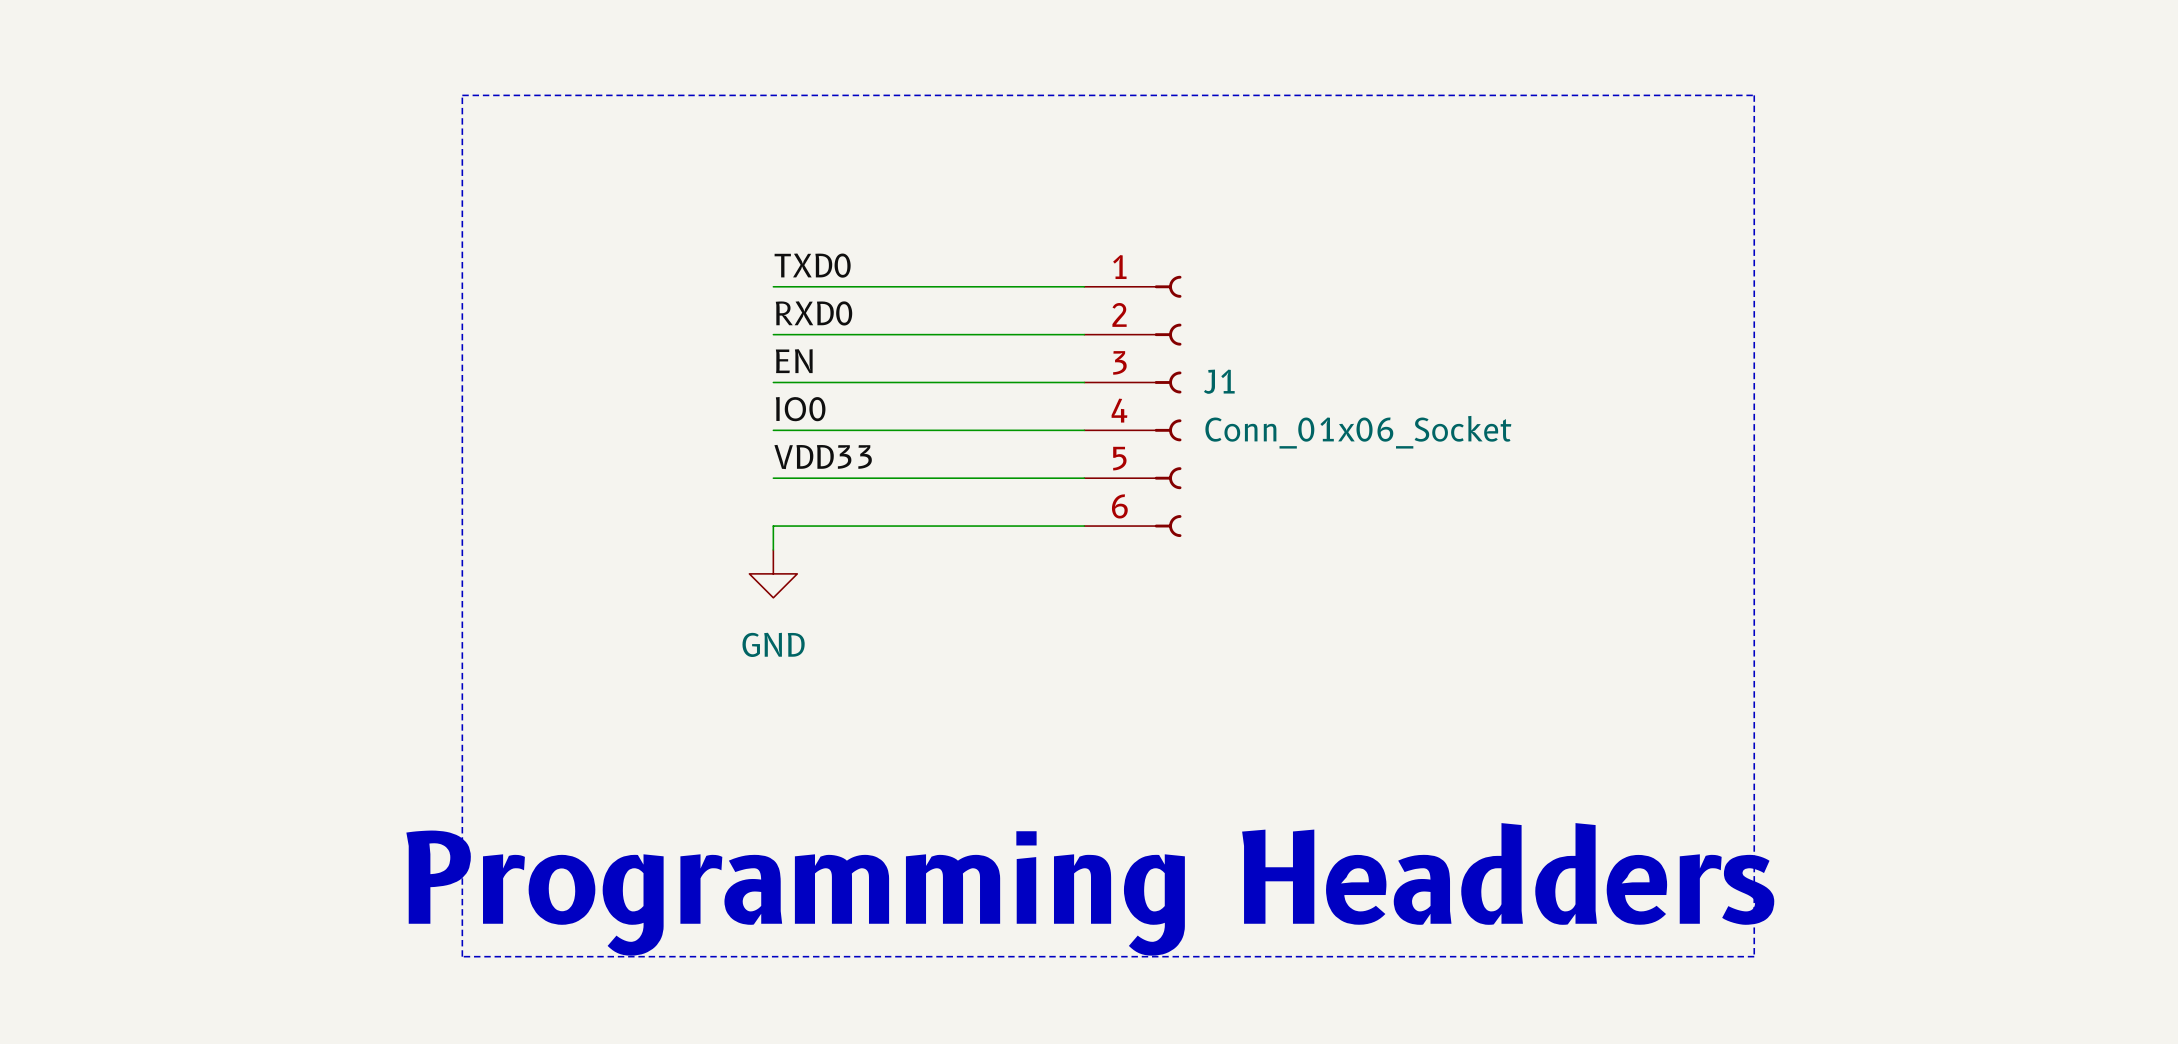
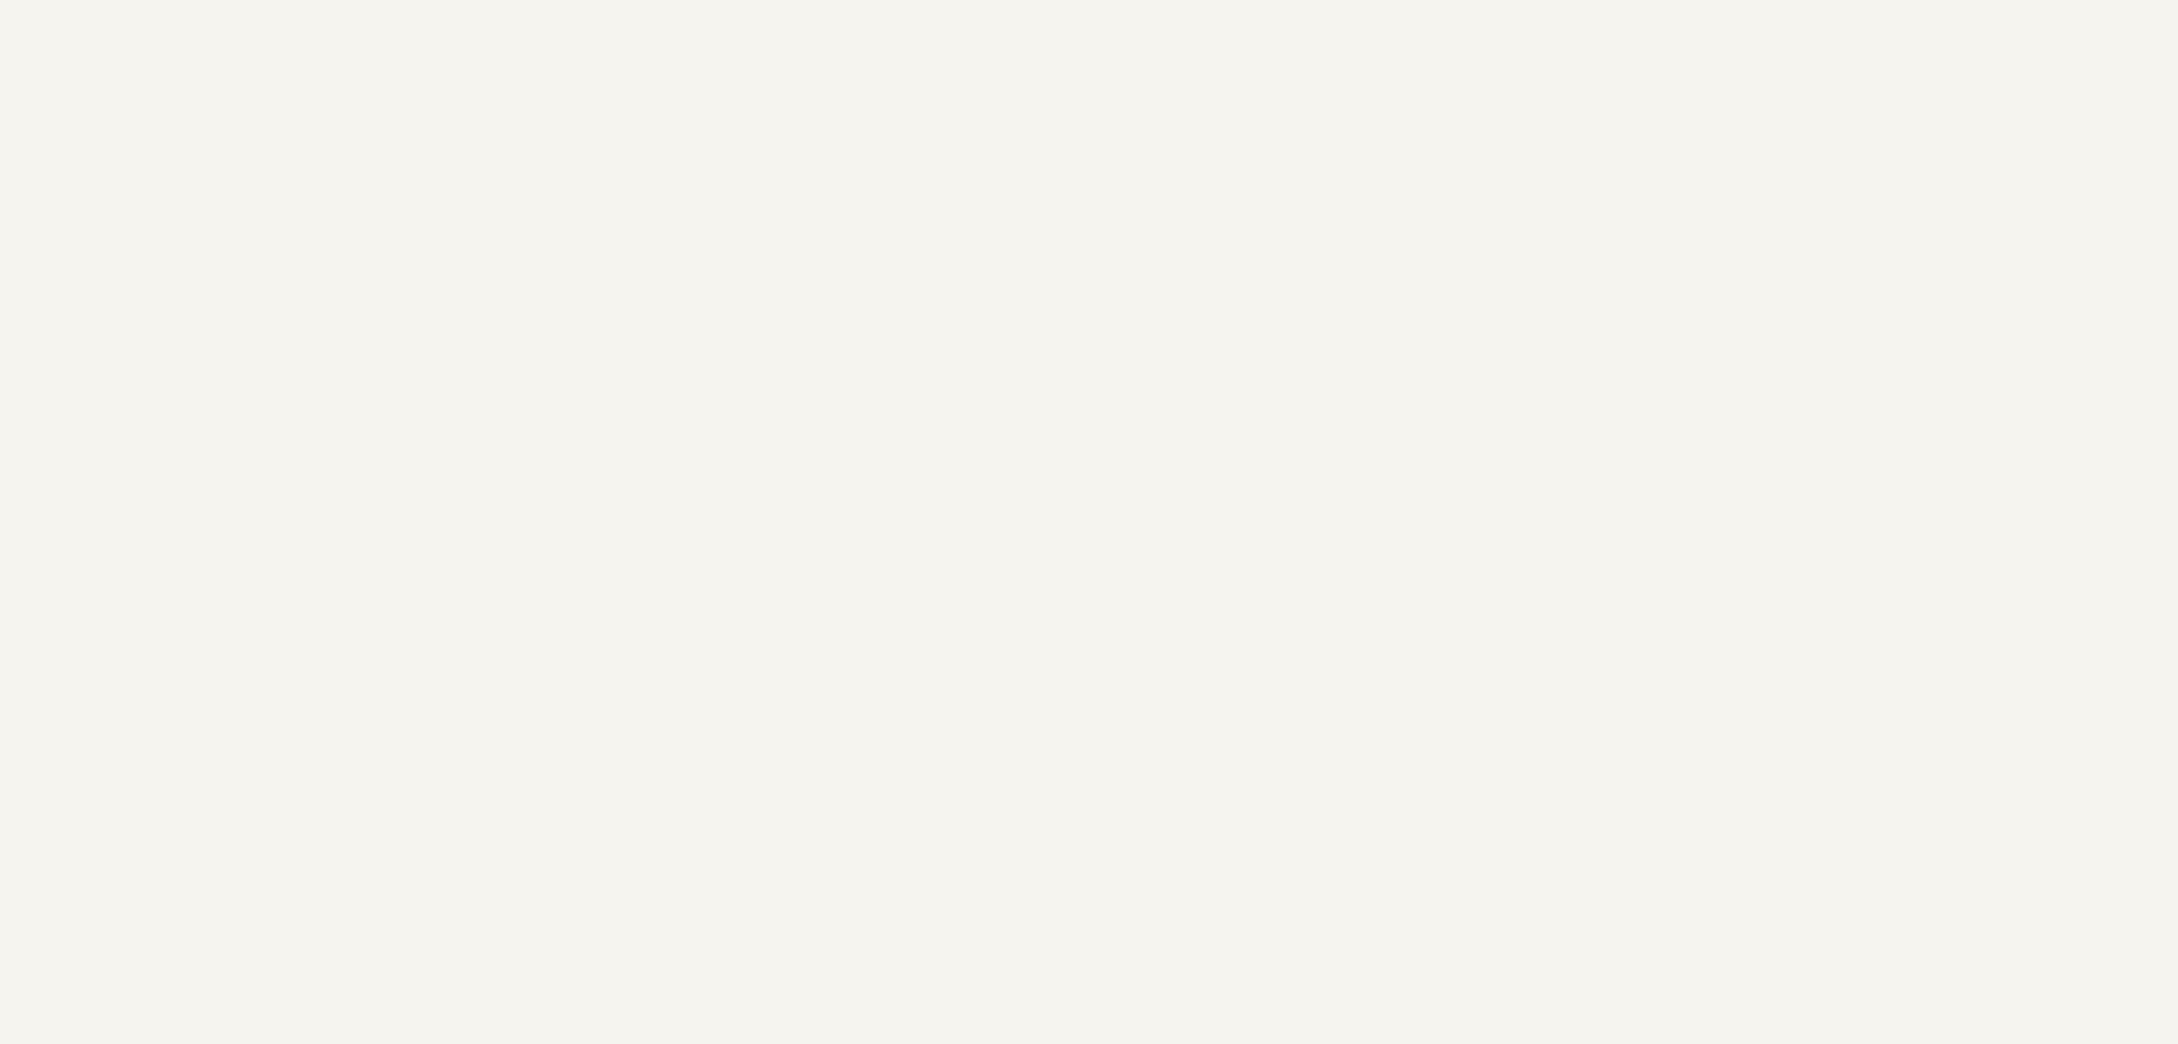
line: (462, 95) (1754, 95) (1754, 956) (462, 956) (462, 95) -> none
label: TXD0 (812, 265) -> none
wire: (773, 286) (1084, 286) -> none
label: RXD0 (813, 313) -> none
wire: (773, 334) (1084, 334) -> none
label: EN (794, 361) -> none
wire: (773, 382) (1084, 382) -> none
J1: Conn_01x06_Socket (1132, 406) -> none
label: IO0 (800, 409) -> none
wire: (773, 430) (1084, 430) -> none
label: VDD33 (823, 456) -> none
wire: (773, 478) (1084, 478) -> none
wire: (1084, 526) (773, 526) (773, 549) -> none
power symbol: GND (773, 573) -> none
text: Programming Headders (1090, 889) -> none

